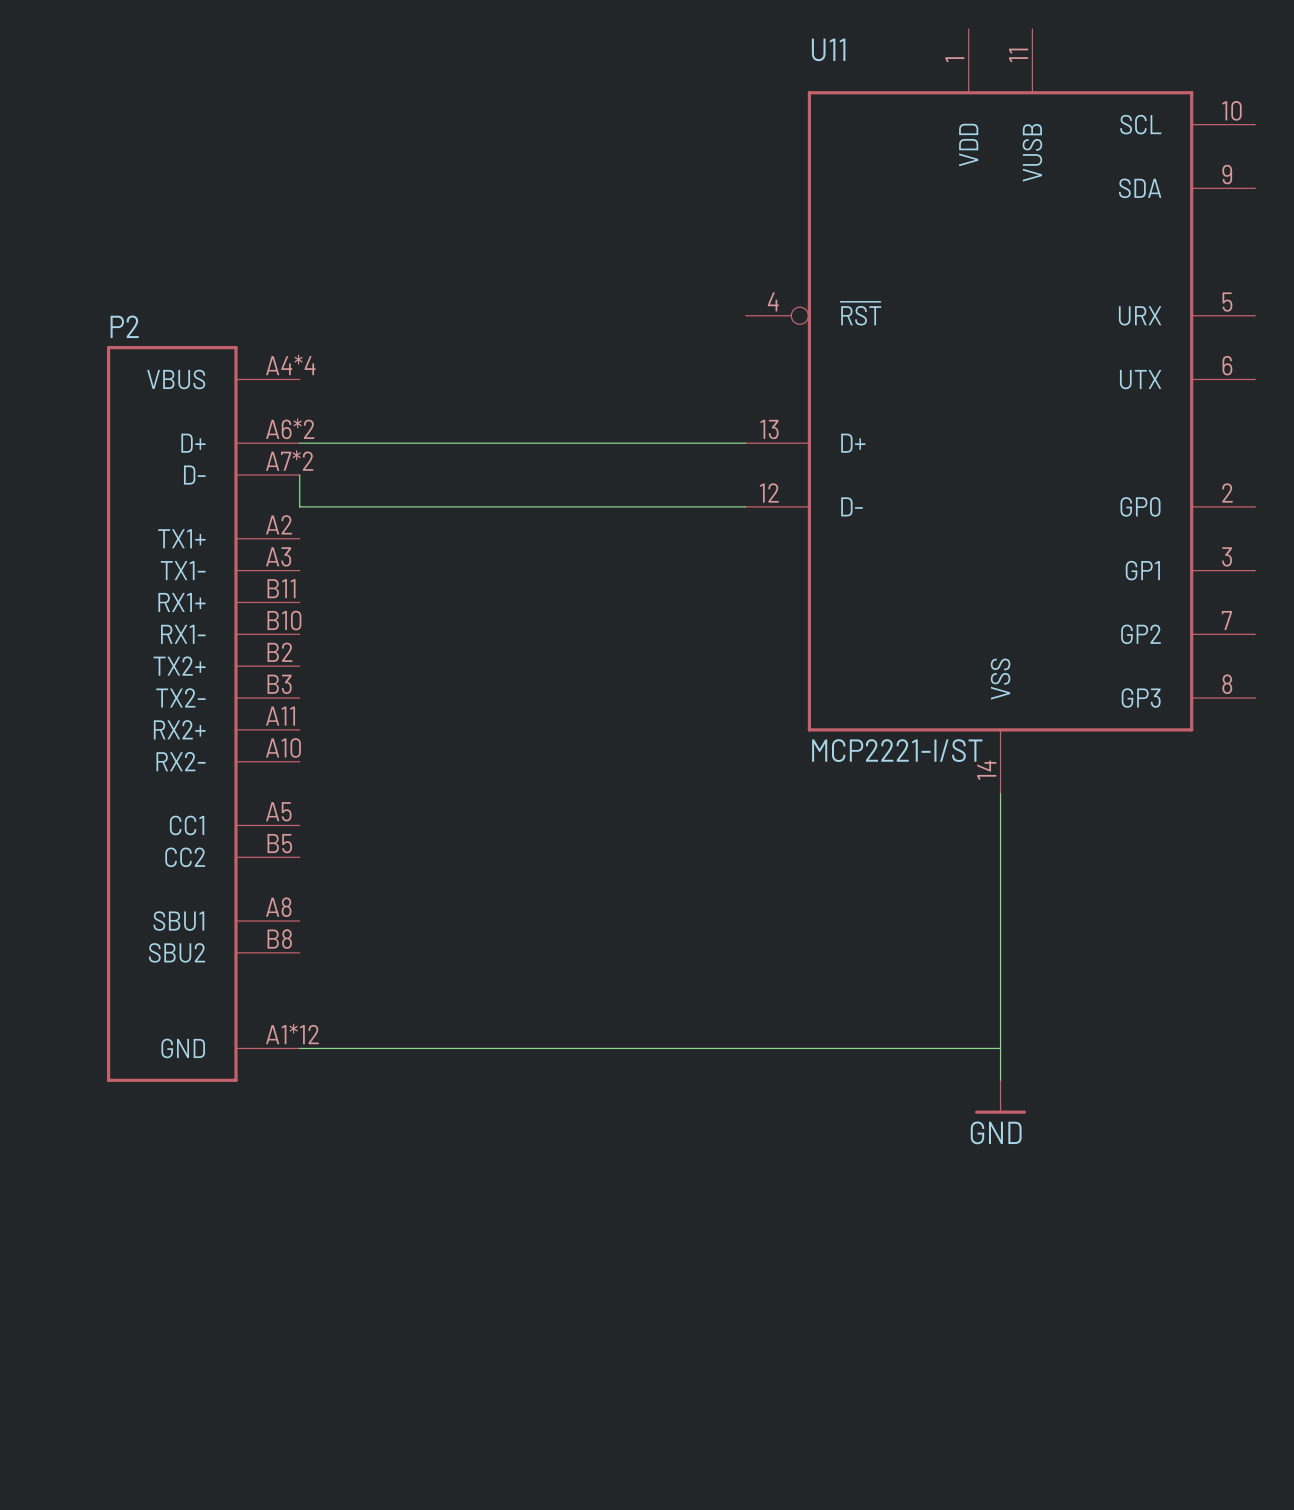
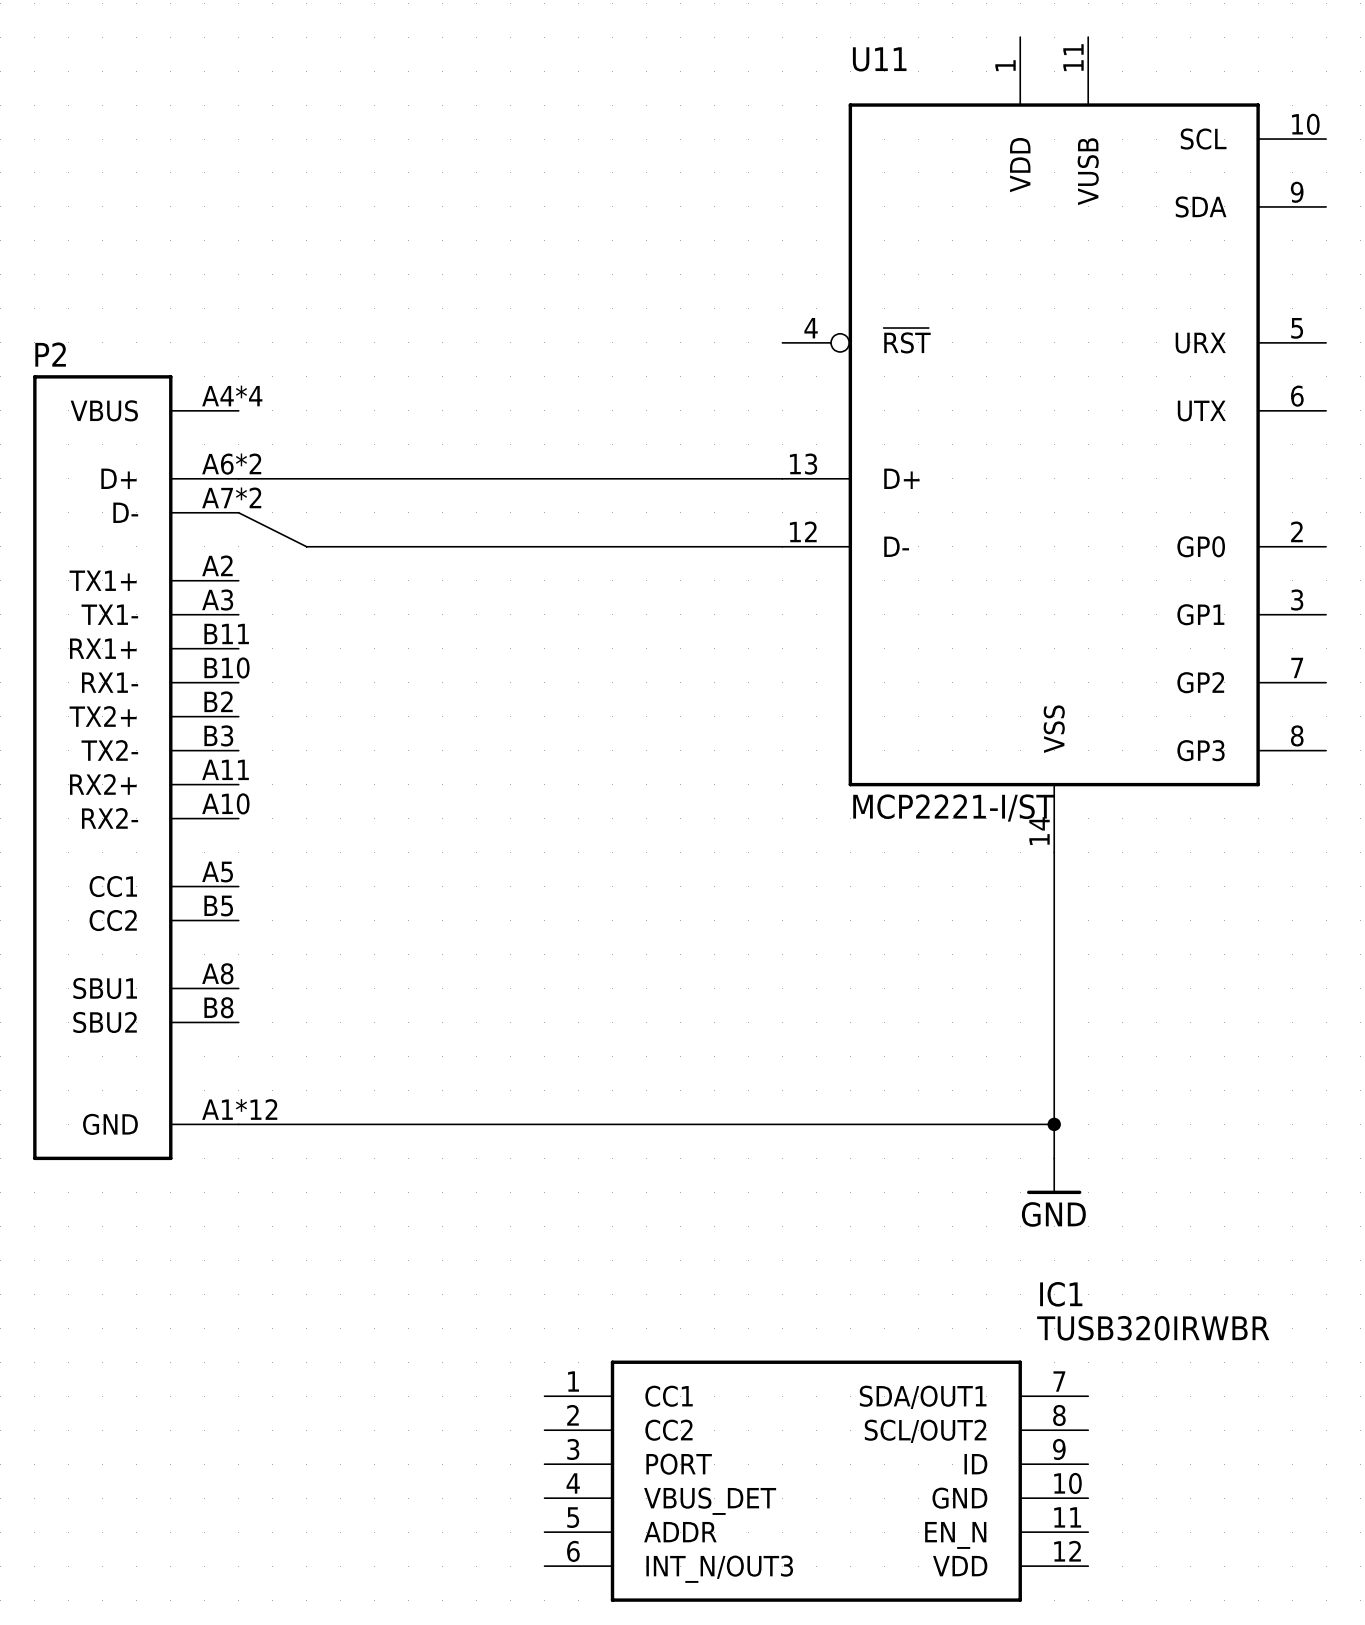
wire: (299, 475) (299, 506) -> (238, 512) (306, 546)
P2 position: (203, 713) -> (135, 767)
junction: none -> (1054, 1124)
IC1: none -> TUSB320IRWBR (816, 1481)

